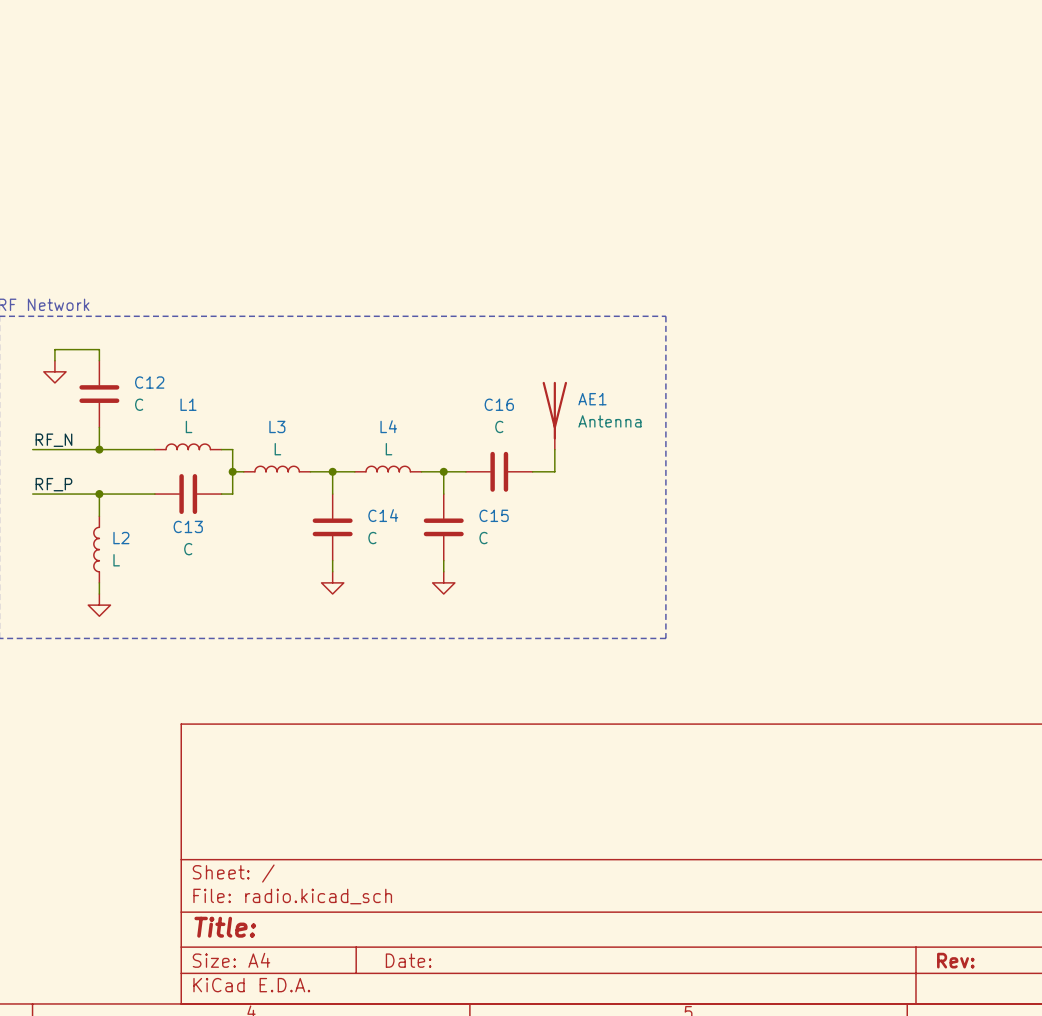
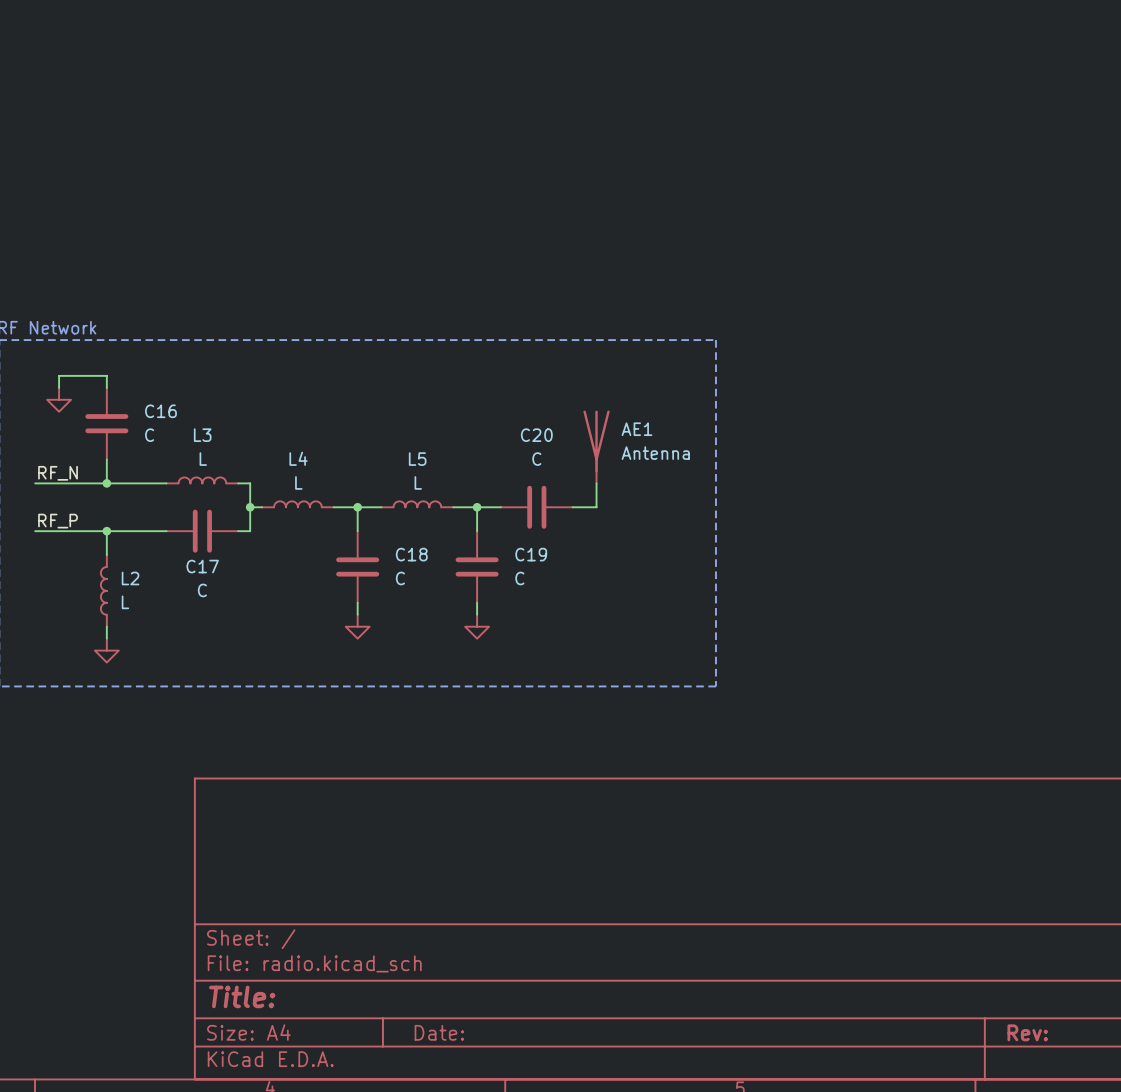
C12 name: C12 (149, 382) -> C16 (160, 411)
L1 name: L1 (188, 404) -> L3 (202, 435)
C16 name: C16 (499, 404) -> C20 (536, 435)
L3 name: L3 (277, 426) -> L4 (298, 458)
L4 name: L4 (388, 426) -> L5 (417, 459)
C14 name: C14 (383, 515) -> C18 (411, 554)
C15 name: C15 (494, 515) -> C19 (531, 554)
C13 name: C13 (188, 526) -> C17 (202, 566)

